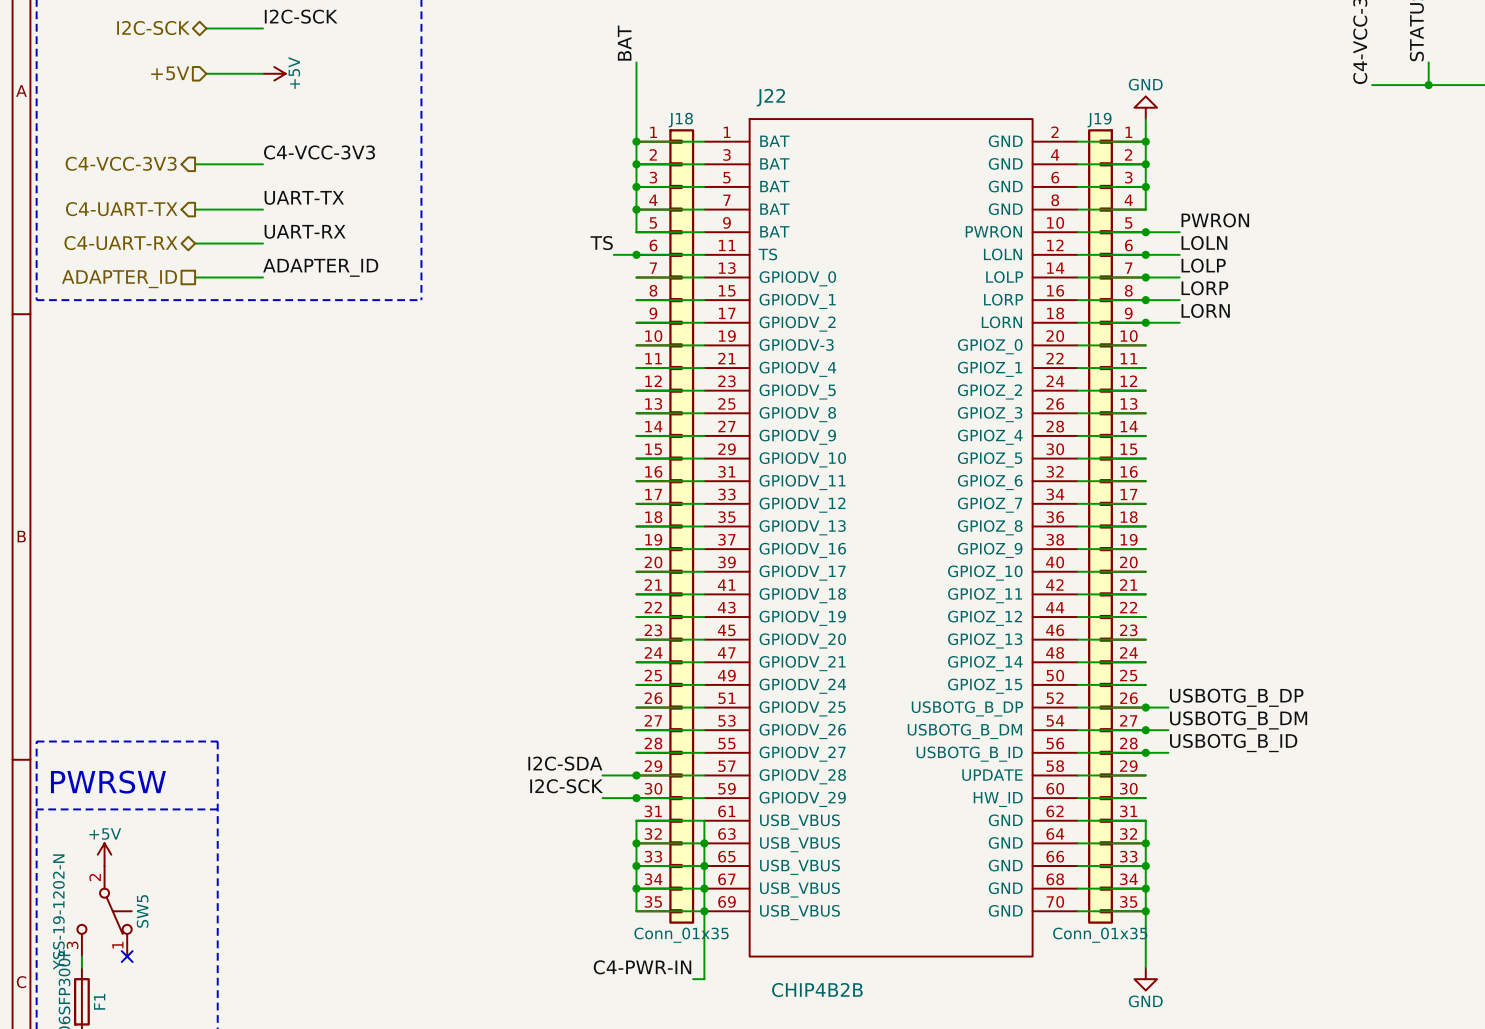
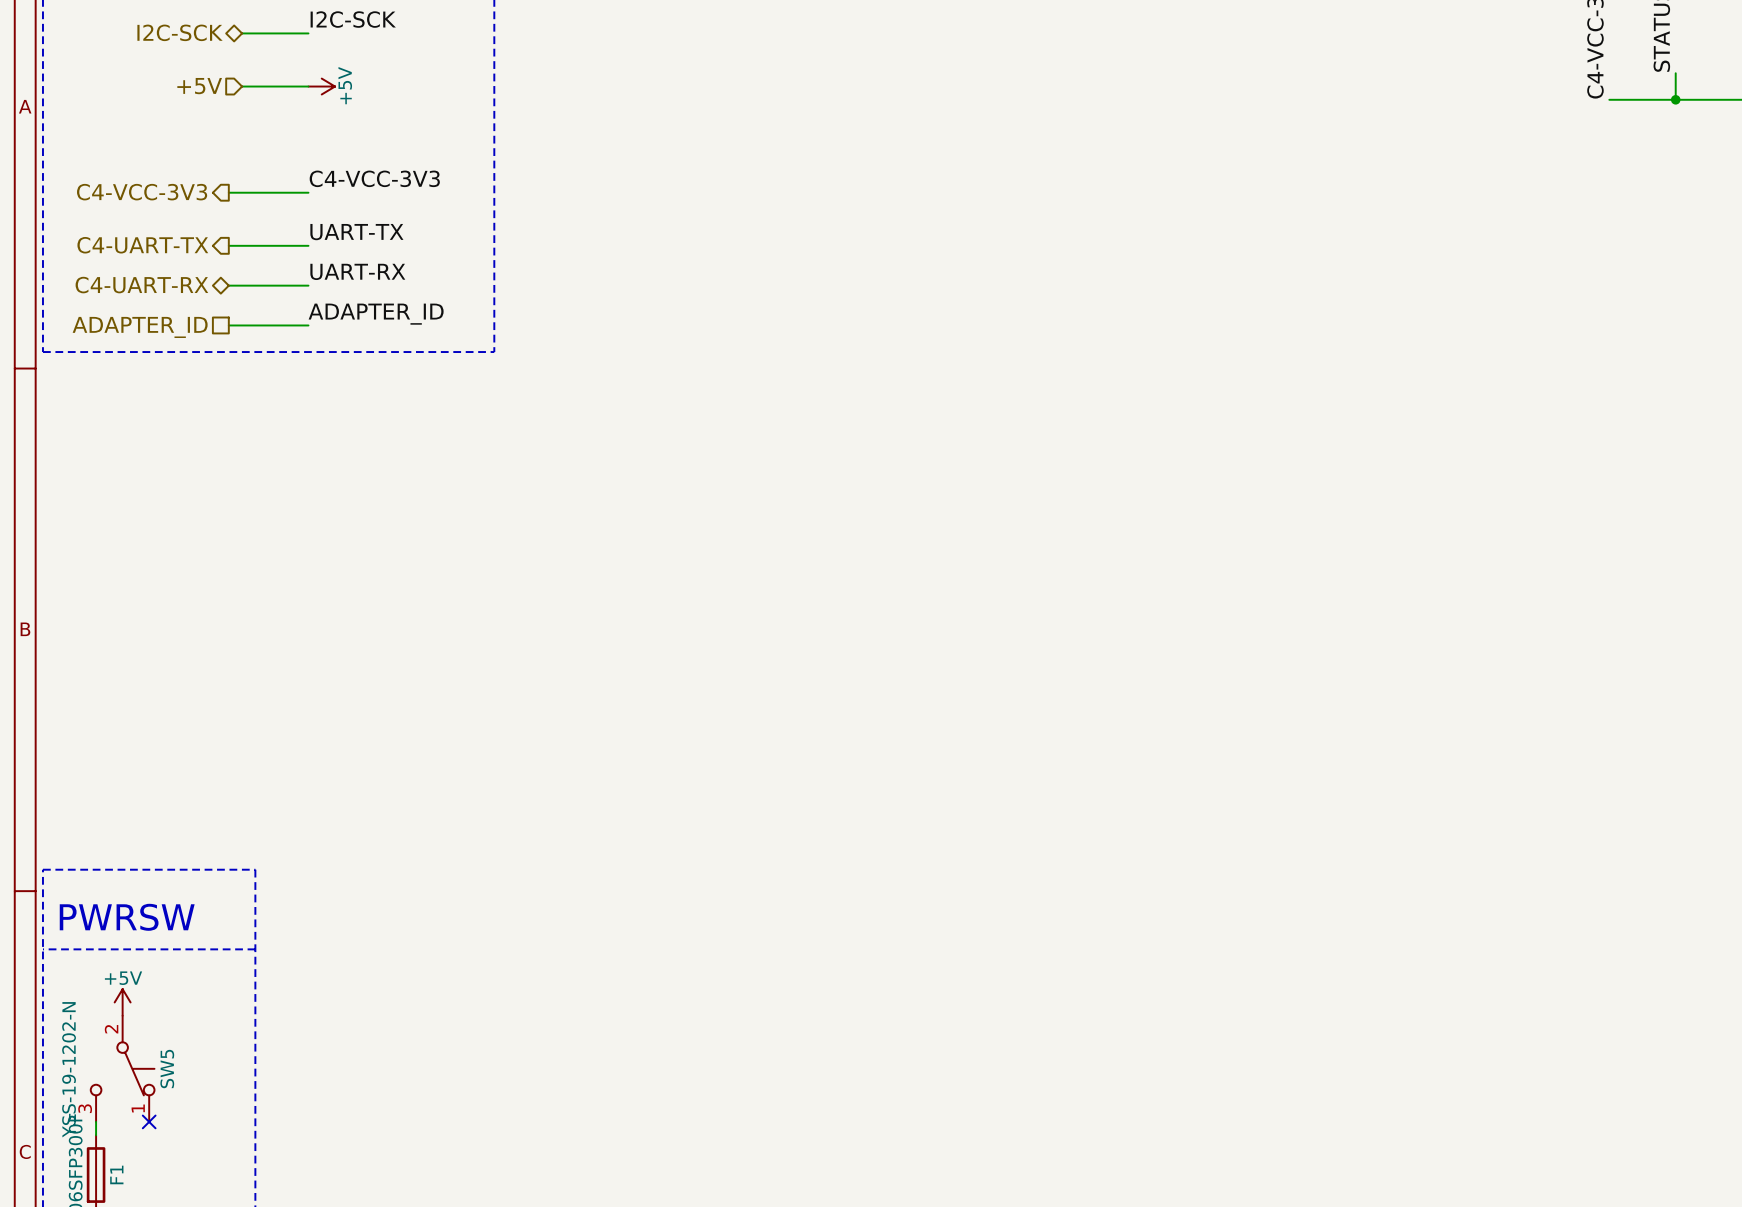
label: BAT (624, 43) -> none
wire: (636, 62) (636, 232) (704, 232) -> none
power symbol: GND (1145, 107) -> none
wire: (1145, 119) (1145, 209) (1077, 209) -> none
wire: (636, 141) (704, 141) -> none
junction: (636, 141) -> none
wire: (1077, 141) (1145, 141) -> none
junction: (1145, 141) -> none
wire: (636, 164) (704, 164) -> none
junction: (636, 164) -> none
wire: (1077, 164) (1145, 164) -> none
junction: (1145, 164) -> none
wire: (636, 186) (704, 186) -> none
junction: (636, 186) -> none
wire: (1077, 186) (1145, 186) -> none
junction: (1145, 186) -> none
wire: (636, 209) (704, 209) -> none
junction: (636, 209) -> none
label: PWRON (1215, 220) -> none
wire: (1077, 232) (1179, 232) -> none
junction: (1145, 232) -> none
label: TS (601, 243) -> none
label: LOLN (1204, 243) -> none
wire: (613, 254) (704, 254) -> none
junction: (636, 254) -> none
wire: (1077, 254) (1179, 254) -> none
junction: (1145, 254) -> none
label: LOLP (1203, 265) -> none
wire: (636, 277) (704, 277) -> none
wire: (1077, 277) (1179, 277) -> none
junction: (1145, 277) -> none
label: LORP (1204, 288) -> none
wire: (636, 300) (704, 300) -> none
wire: (1077, 300) (1179, 300) -> none
junction: (1145, 300) -> none
label: LORN (1205, 310) -> none
wire: (636, 322) (704, 322) -> none
wire: (1077, 322) (1179, 322) -> none
junction: (1145, 322) -> none
wire: (636, 345) (704, 345) -> none
wire: (1077, 345) (1145, 345) -> none
wire: (636, 368) (704, 368) -> none
wire: (1077, 368) (1145, 368) -> none
wire: (636, 390) (704, 390) -> none
wire: (1077, 390) (1145, 390) -> none
wire: (636, 413) (704, 413) -> none
wire: (1077, 413) (1145, 413) -> none
wire: (636, 435) (704, 435) -> none
wire: (1077, 435) (1145, 435) -> none
wire: (636, 458) (704, 458) -> none
wire: (1077, 458) (1145, 458) -> none
wire: (636, 481) (704, 481) -> none
wire: (1077, 481) (1145, 481) -> none
wire: (636, 503) (704, 503) -> none
wire: (1077, 503) (1145, 503) -> none
wire: (636, 526) (704, 526) -> none
J18: Conn_01x35 (665, 526) -> none
wire: (1077, 526) (1145, 526) -> none
J19: Conn_01x35 (1116, 526) -> none
J22: CHIP4B2B (891, 537) -> none
wire: (636, 549) (704, 549) -> none
wire: (1077, 549) (1145, 549) -> none
wire: (636, 571) (704, 571) -> none
wire: (1077, 571) (1145, 571) -> none
wire: (636, 594) (704, 594) -> none
wire: (1077, 594) (1145, 594) -> none
wire: (636, 617) (704, 617) -> none
wire: (1077, 617) (1145, 617) -> none
wire: (636, 639) (704, 639) -> none
wire: (1077, 639) (1145, 639) -> none
wire: (636, 662) (704, 662) -> none
wire: (1077, 662) (1145, 662) -> none
wire: (636, 684) (704, 684) -> none
wire: (1077, 684) (1145, 684) -> none
label: USBOTG_B_DP (1236, 697) -> none
wire: (636, 707) (704, 707) -> none
wire: (1077, 707) (1168, 707) -> none
junction: (1145, 707) -> none
label: USBOTG_B_DM (1238, 720) -> none
wire: (636, 730) (704, 730) -> none
wire: (1077, 730) (1168, 730) -> none
junction: (1145, 730) -> none
label: USBOTG_B_ID (1233, 743) -> none
wire: (636, 752) (704, 752) -> none
wire: (1077, 752) (1168, 752) -> none
junction: (1145, 752) -> none
label: I2C-SDA (565, 763) -> none
wire: (602, 775) (704, 775) -> none
junction: (636, 775) -> none
wire: (1077, 775) (1145, 775) -> none
label: I2C-SCK (566, 786) -> none
wire: (602, 798) (704, 798) -> none
junction: (636, 798) -> none
wire: (1077, 798) (1145, 798) -> none
wire: (1077, 820) (1145, 820) (1145, 967) -> none
wire: (636, 843) (704, 843) -> none
junction: (636, 843) -> none
junction: (704, 843) -> none
wire: (1077, 843) (1145, 843) -> none
junction: (1145, 843) -> none
wire: (636, 866) (704, 866) -> none
junction: (636, 866) -> none
junction: (704, 866) -> none
wire: (1077, 866) (1145, 866) -> none
junction: (1145, 866) -> none
wire: (636, 888) (704, 888) -> none
junction: (636, 888) -> none
junction: (704, 888) -> none
wire: (1077, 888) (1145, 888) -> none
junction: (1145, 888) -> none
wire: (704, 911) (636, 911) (636, 820) (704, 820) (704, 979) (693, 979) -> none
junction: (704, 911) -> none
wire: (1077, 911) (1145, 911) -> none
junction: (1145, 911) -> none
label: C4-PWR-IN (642, 967) -> none
power symbol: GND (1145, 979) -> none

